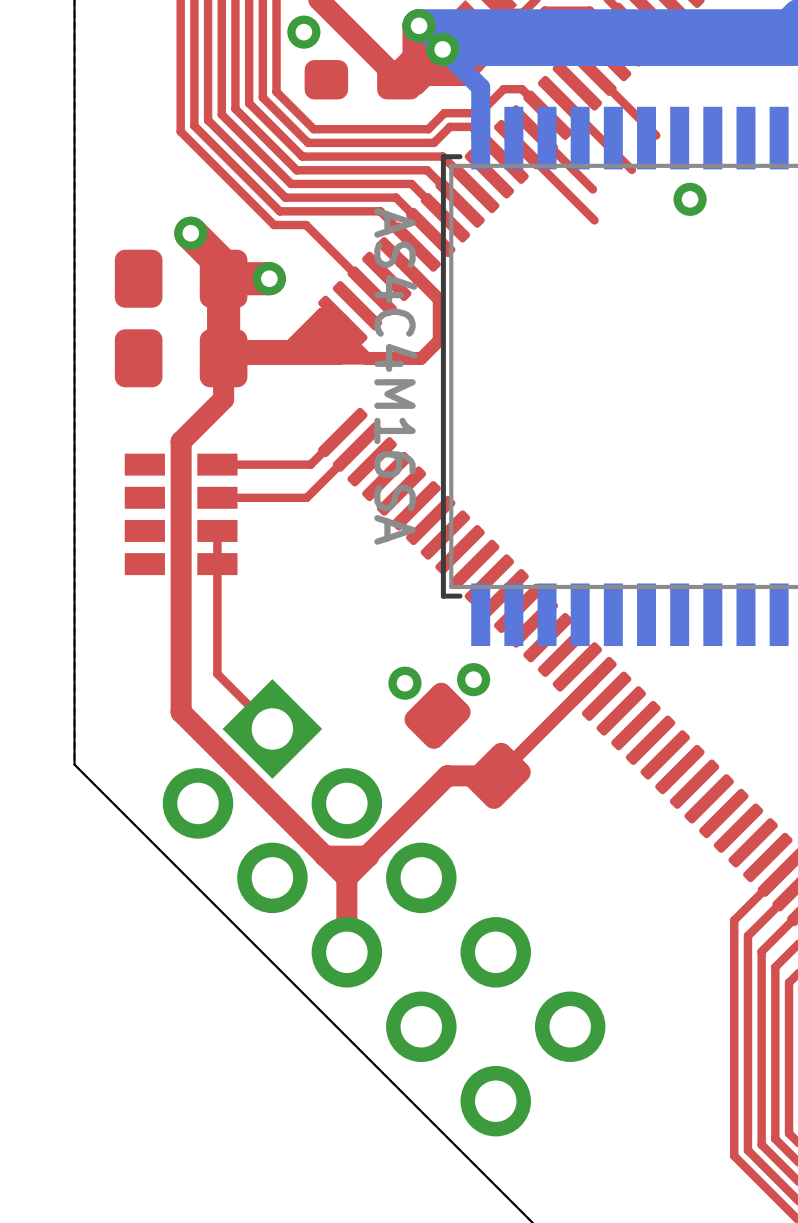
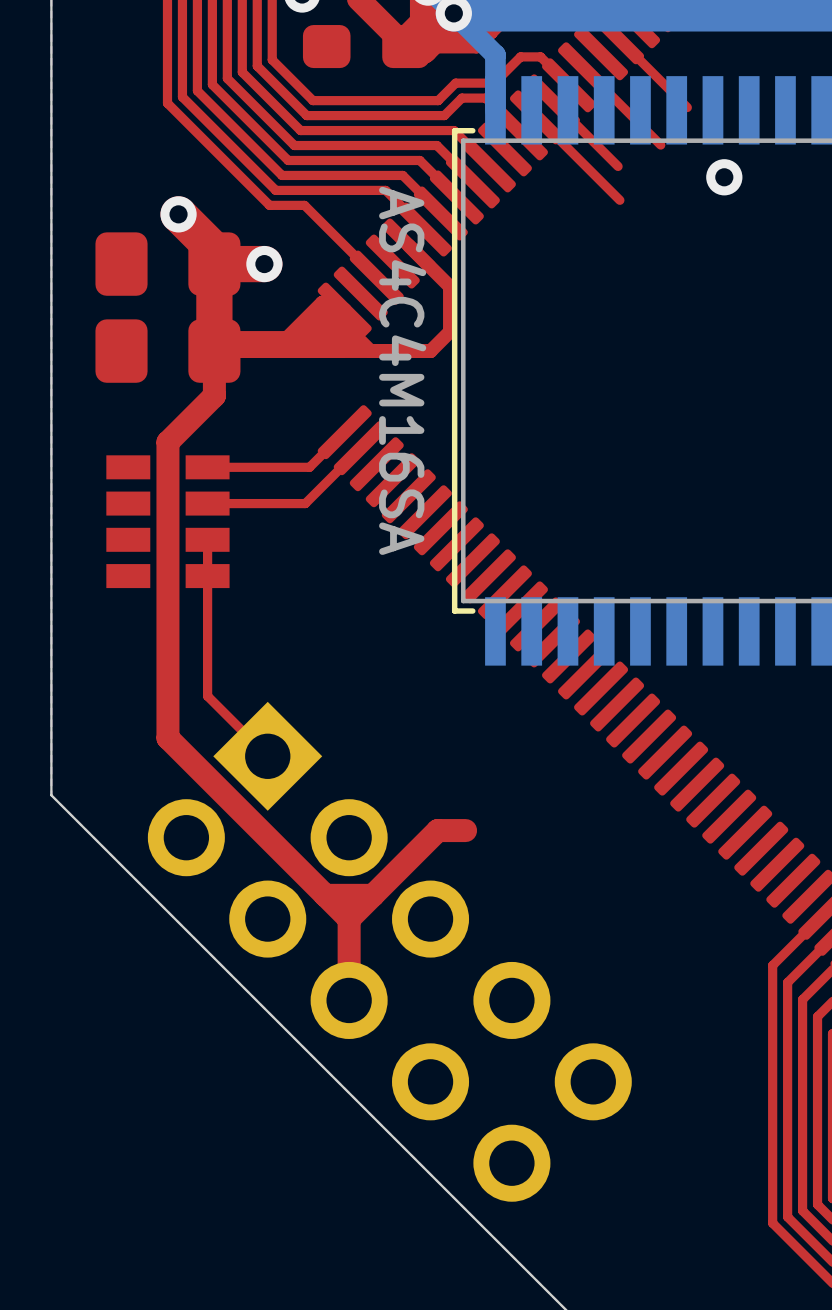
via: (473, 679) -> none
top track: (591, 681) (497, 775) (447, 775) (368, 856) -> (465, 830) (437, 830) (372, 895)
via: (404, 683) -> none
part: (467, 745) -> none

